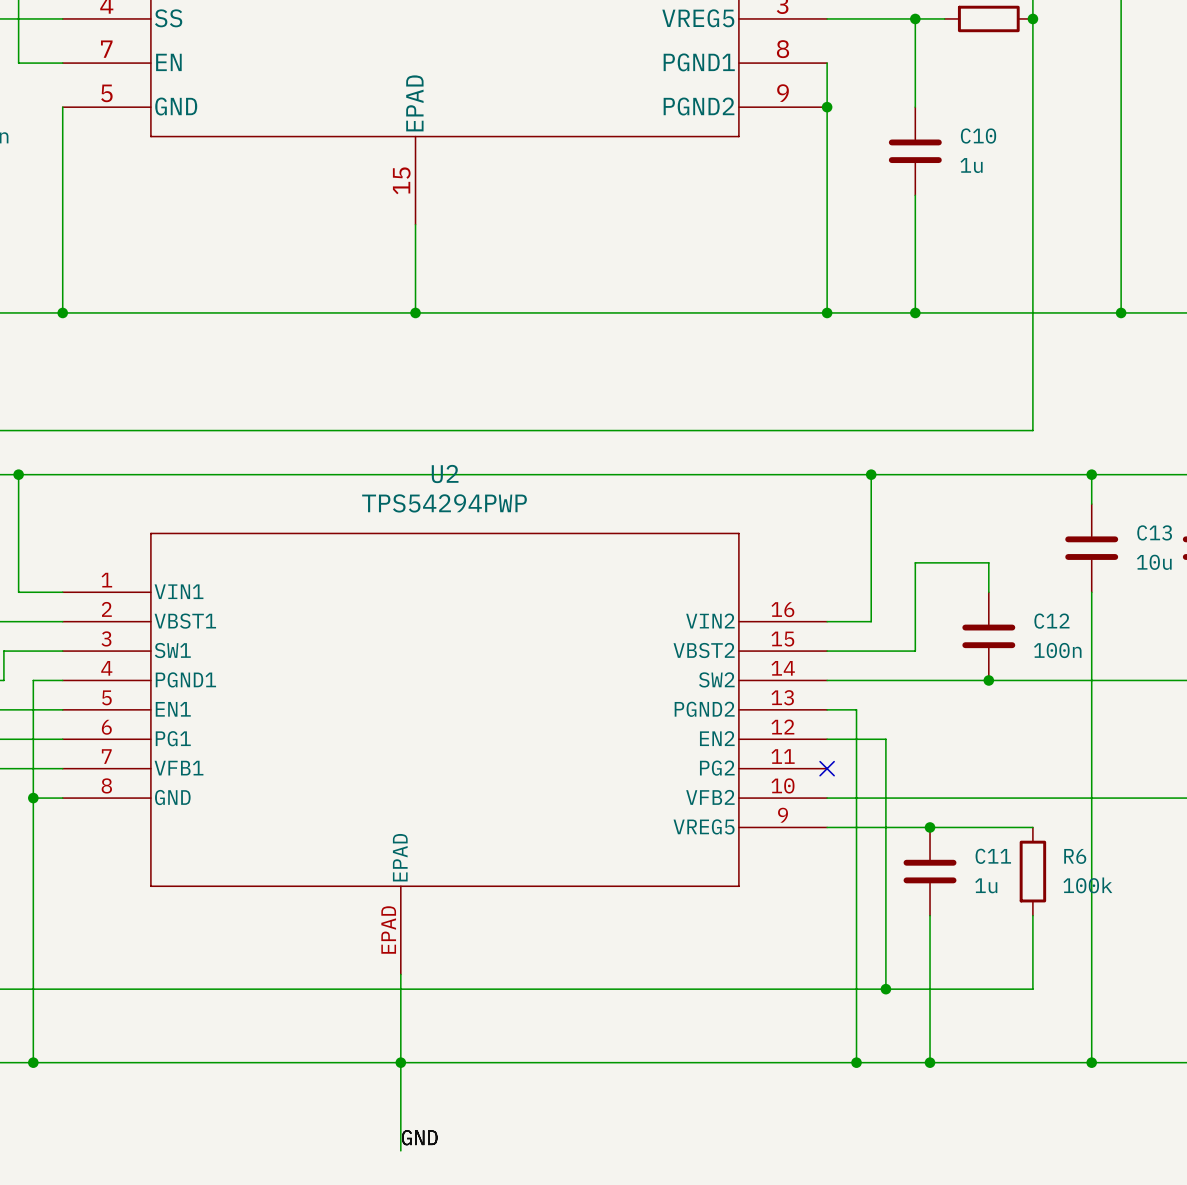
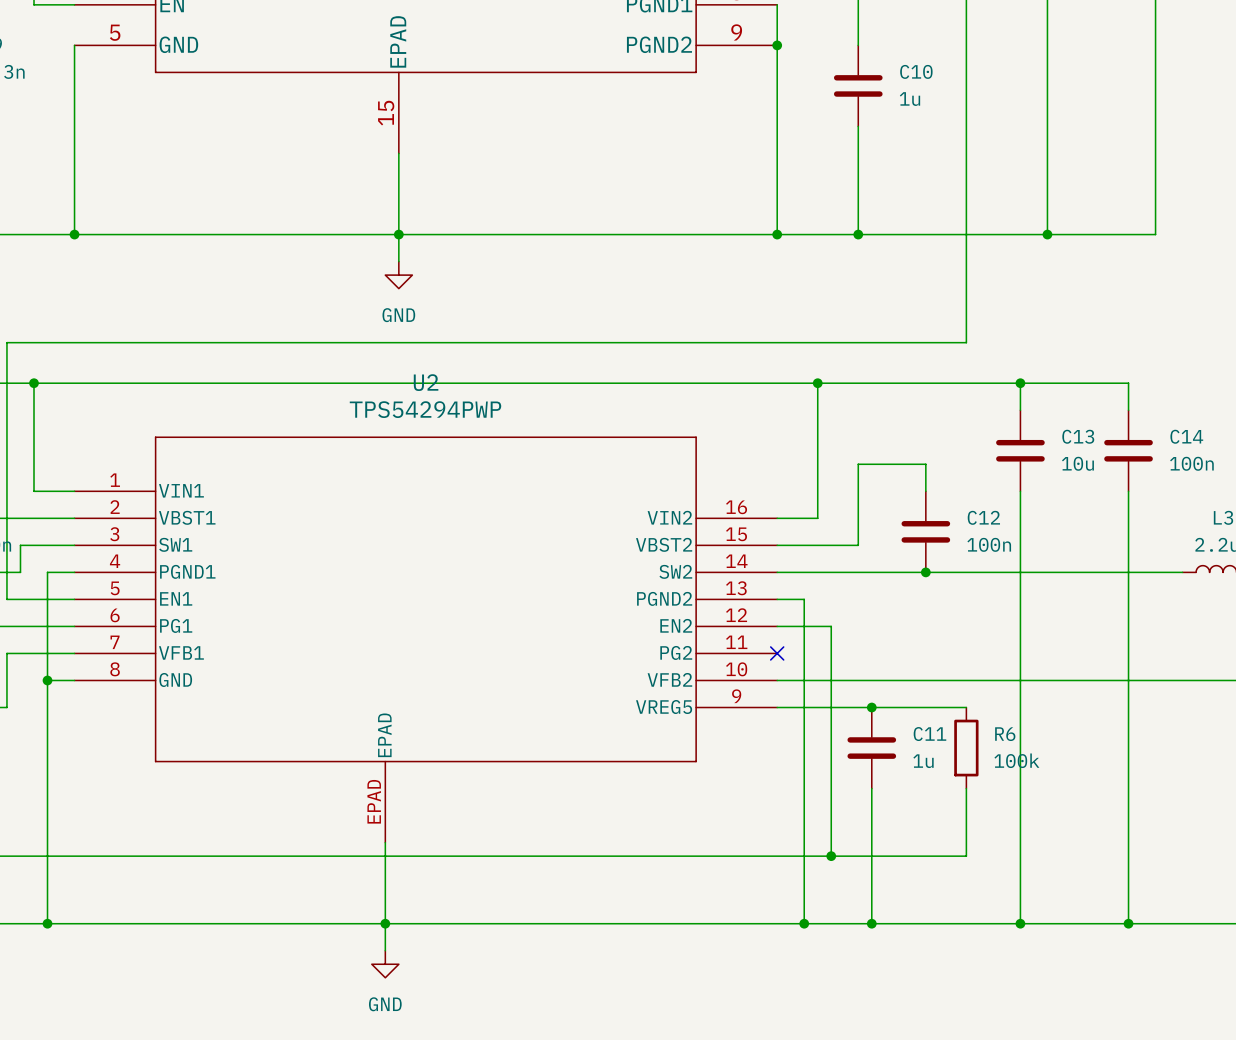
wire: none -> (398, 234) (398, 261)
power symbol: none -> GND (398, 275)
wire: (400, 1092) (400, 1150) -> none
power symbol: none -> GND (385, 964)
label: GND (419, 1137) -> none

